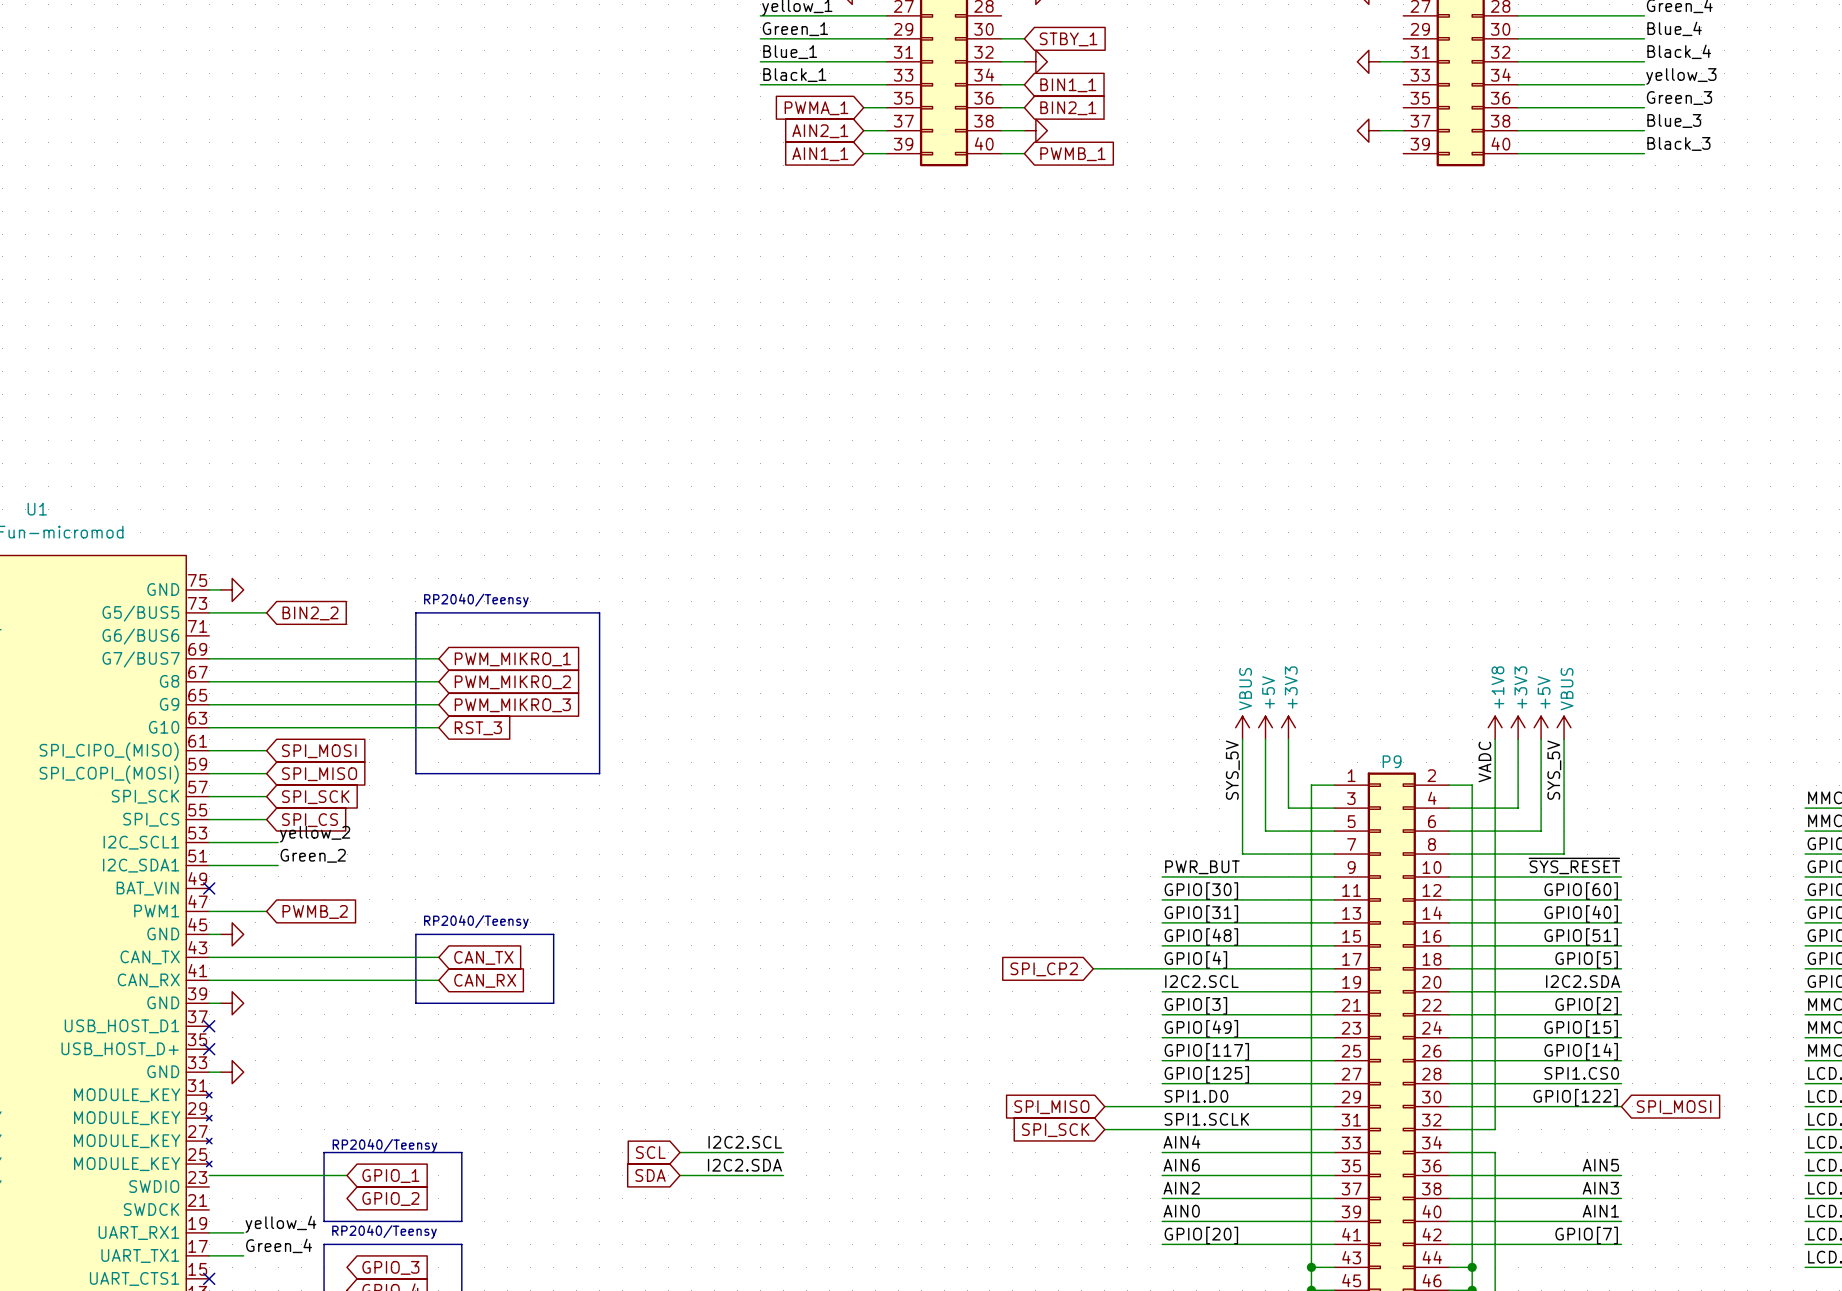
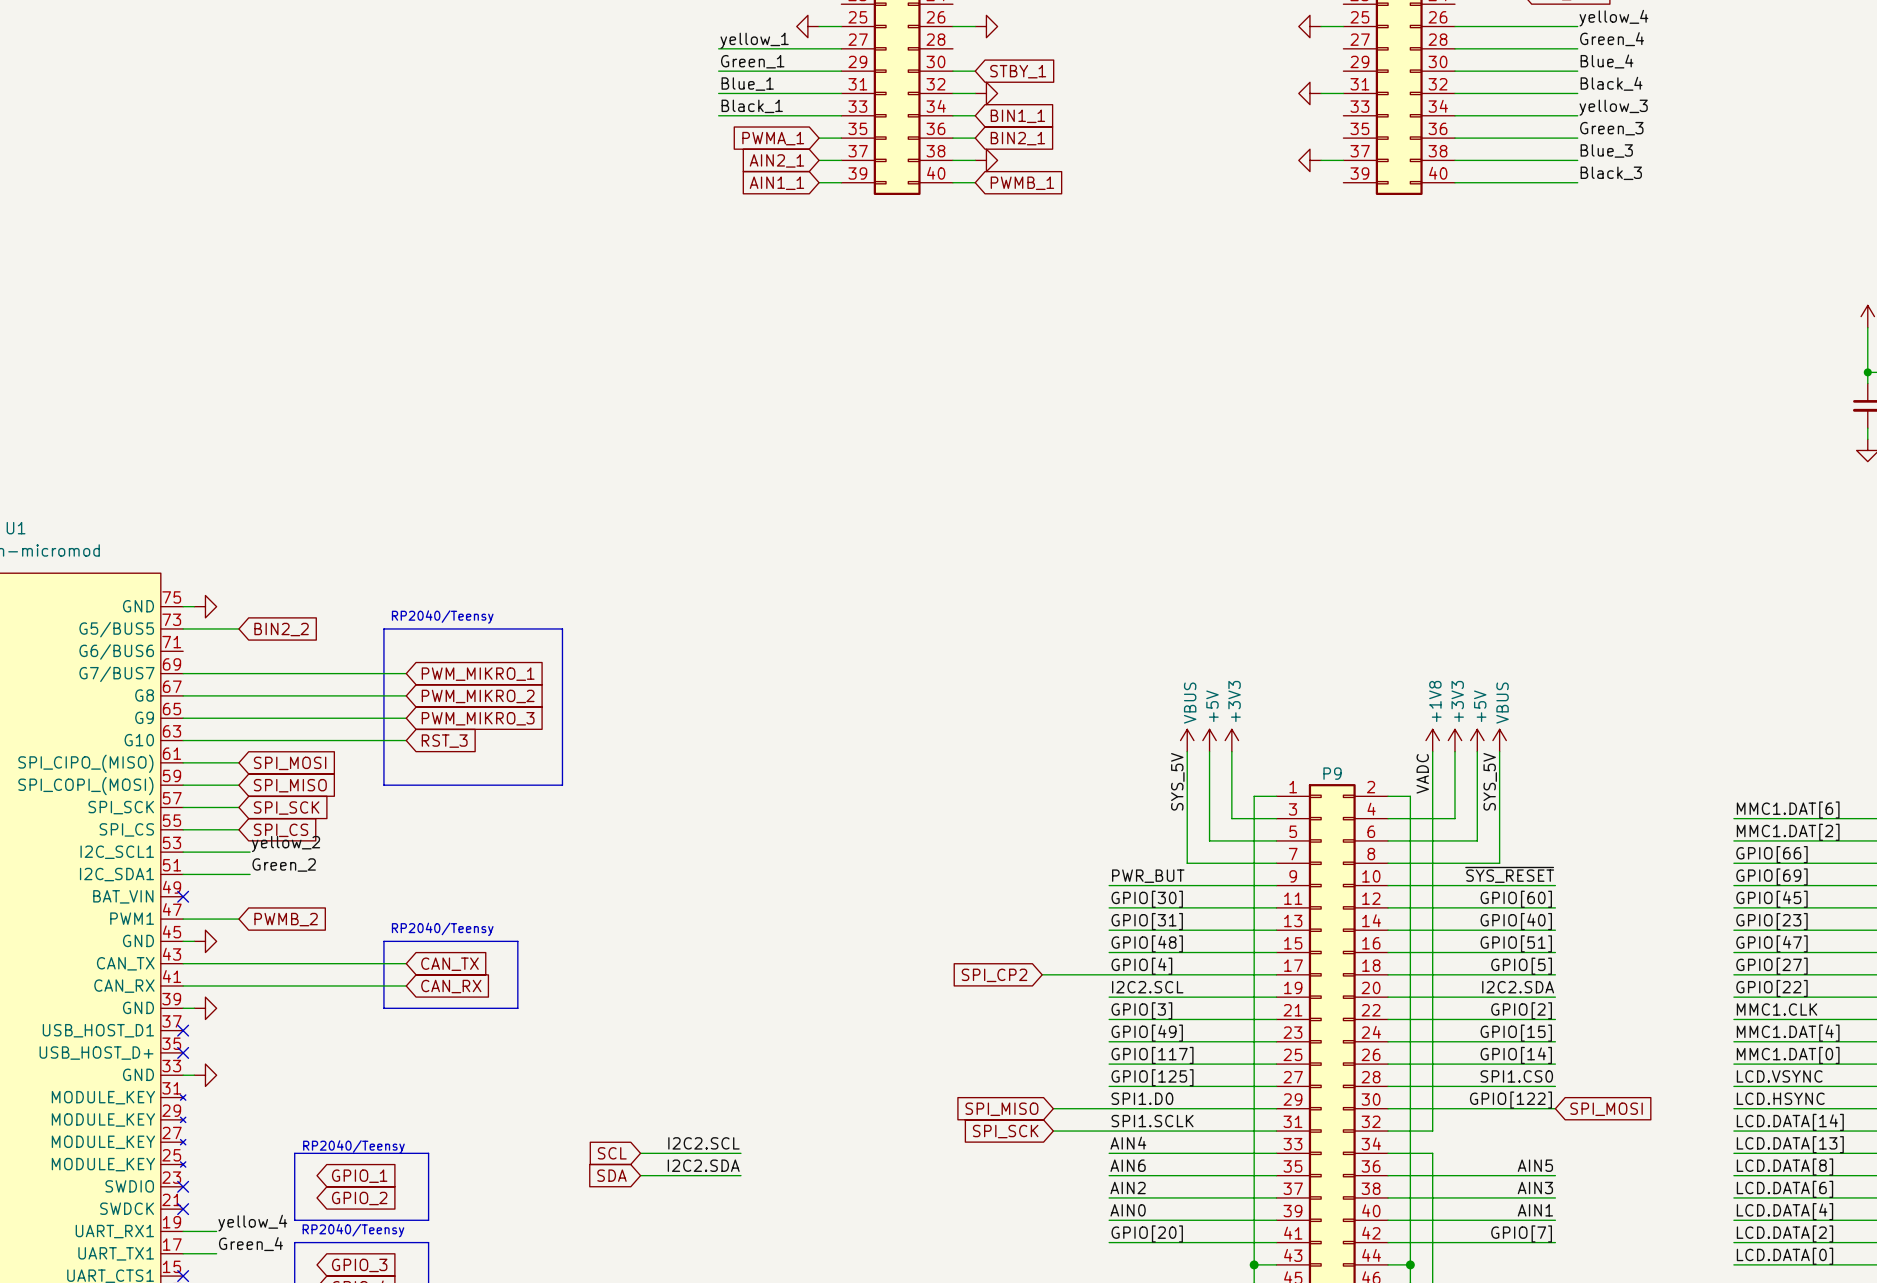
wire: (209, 1175) (347, 1175) -> none
no-connect mark: none -> (183, 1186)
no-connect mark: none -> (183, 1209)

